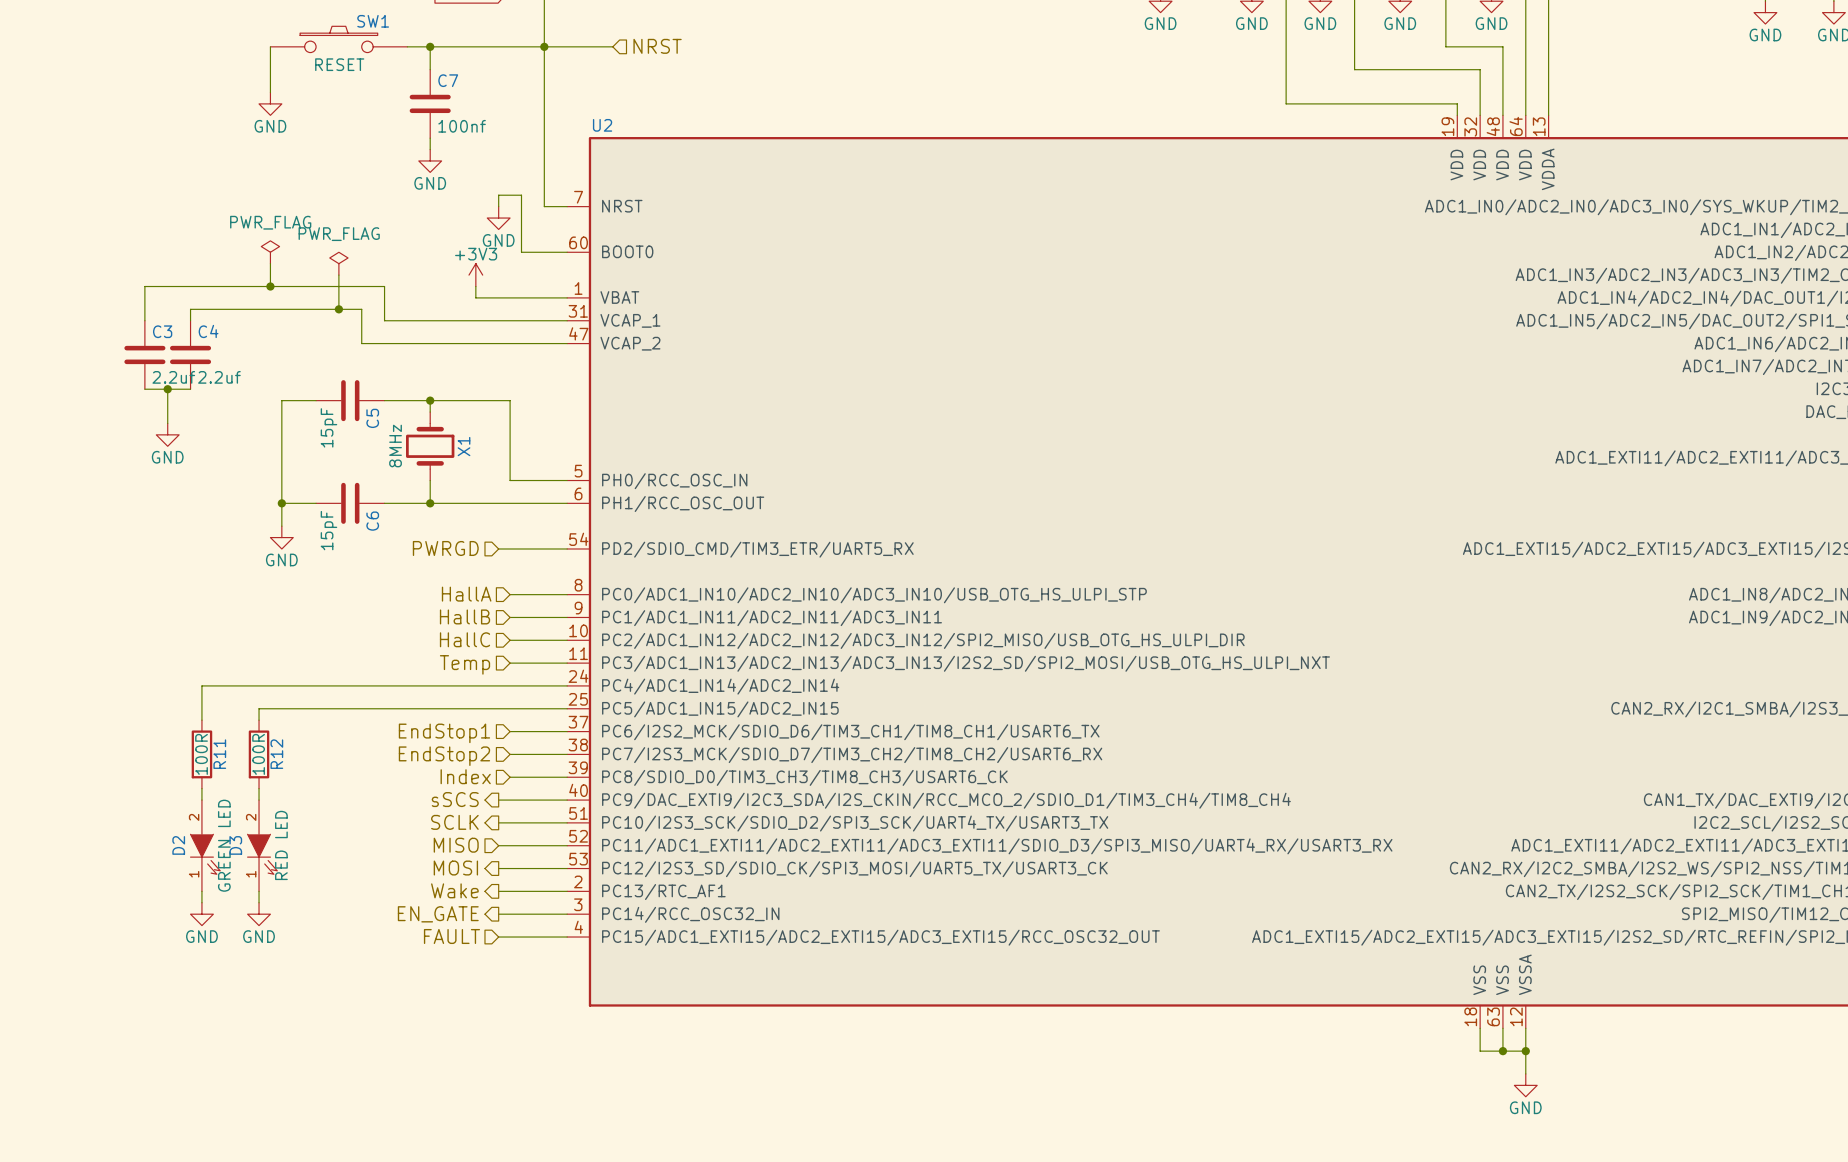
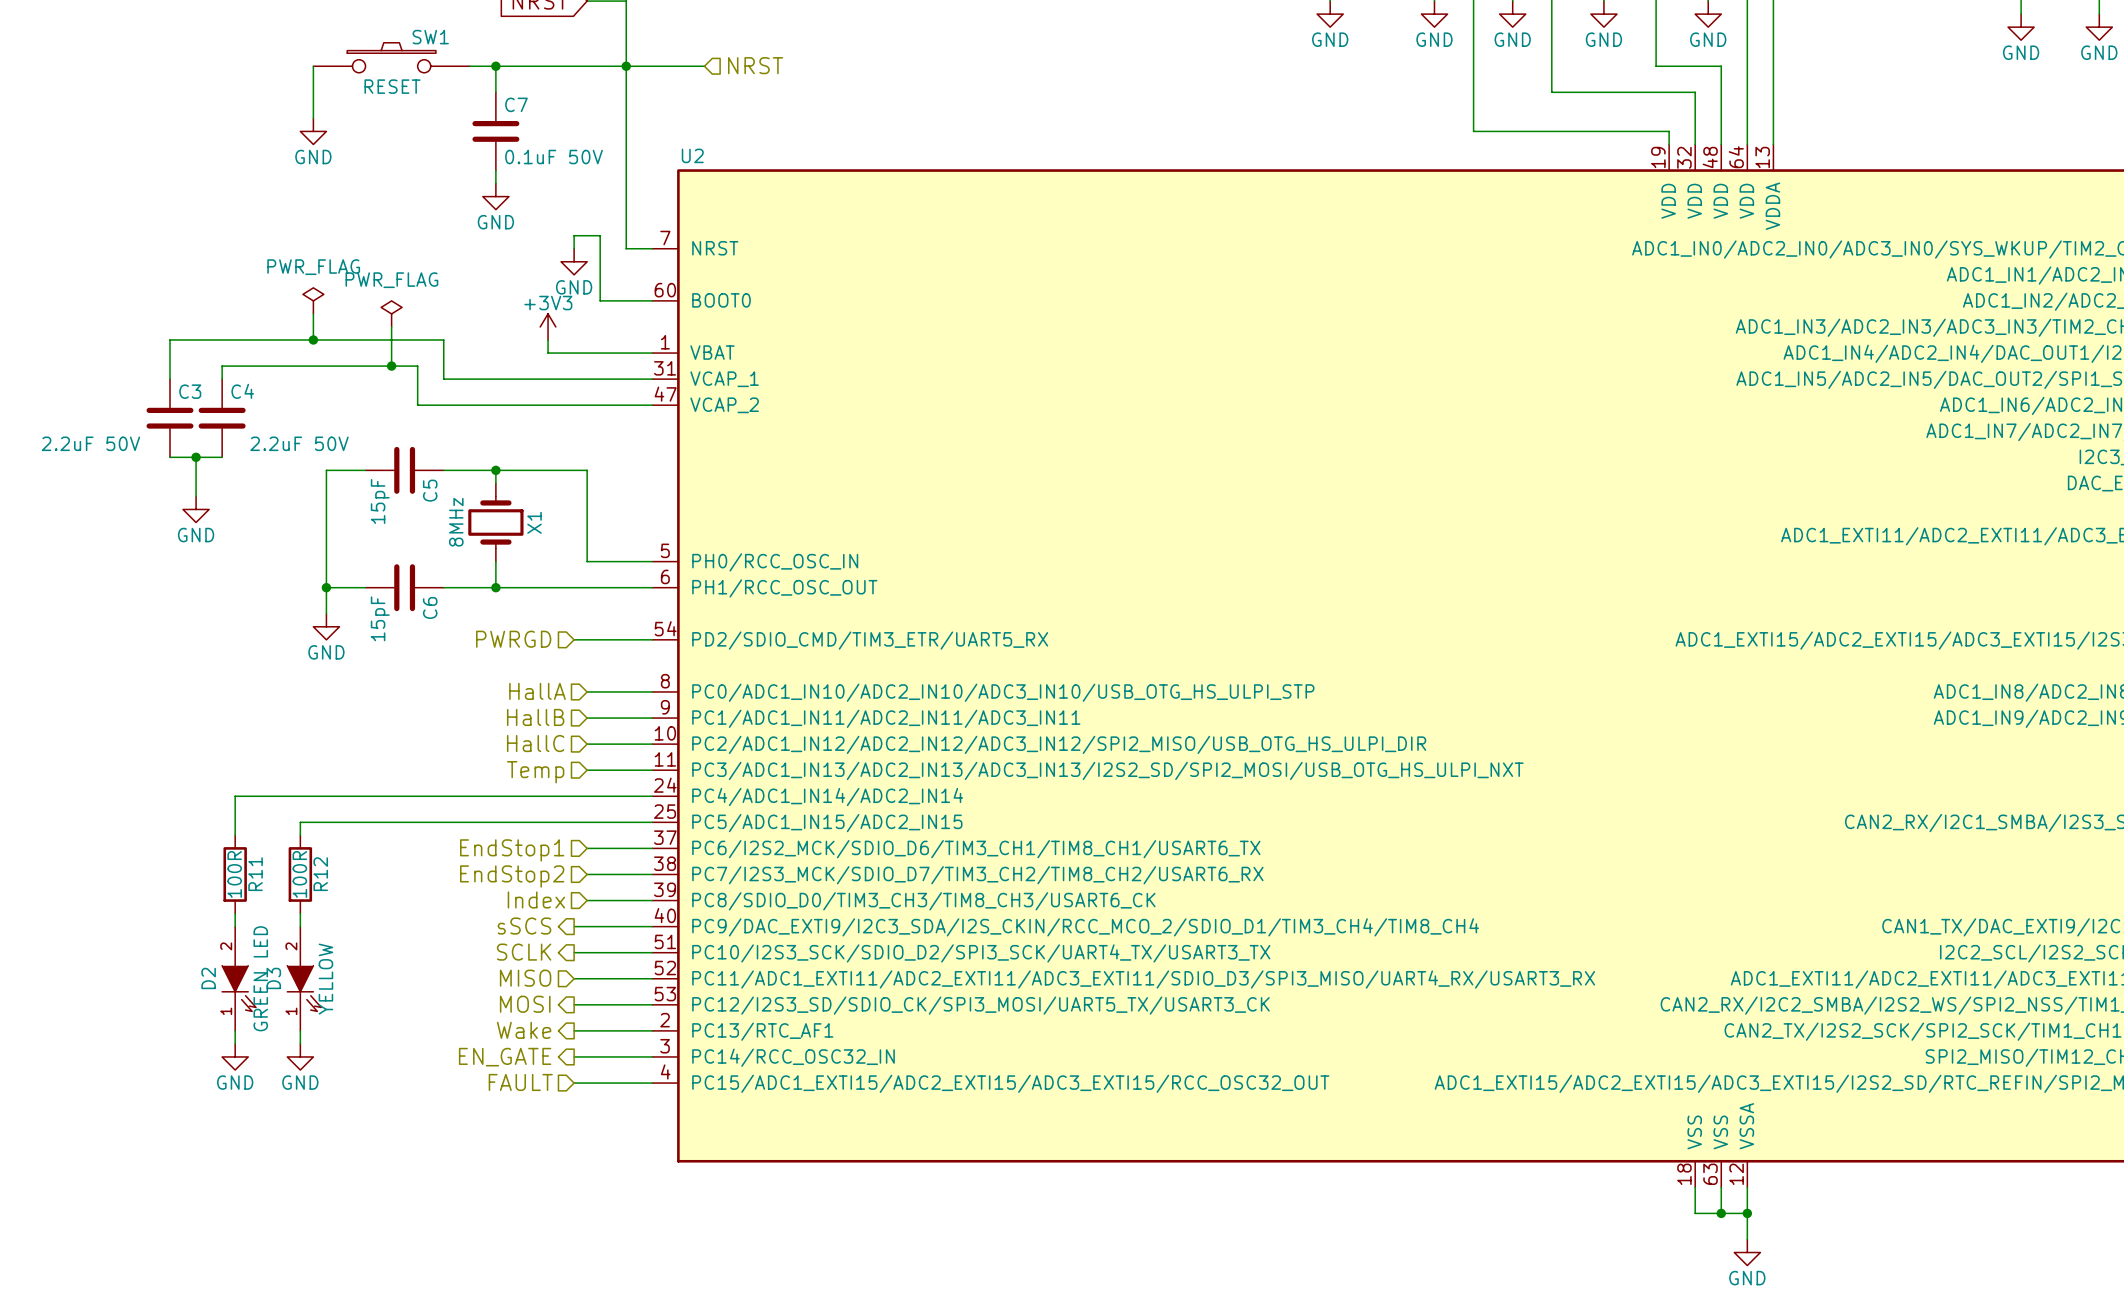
C7 value: 100nf (462, 126) -> 0.1uF 50V (554, 157)
C3 value: 2.2uf (173, 377) -> 2.2uF 50V (90, 443)
C4 value: 2.2uf (219, 377) -> 2.2uF 50V (299, 443)
D3 value: RED LED (281, 845) -> YELLOW (325, 979)

